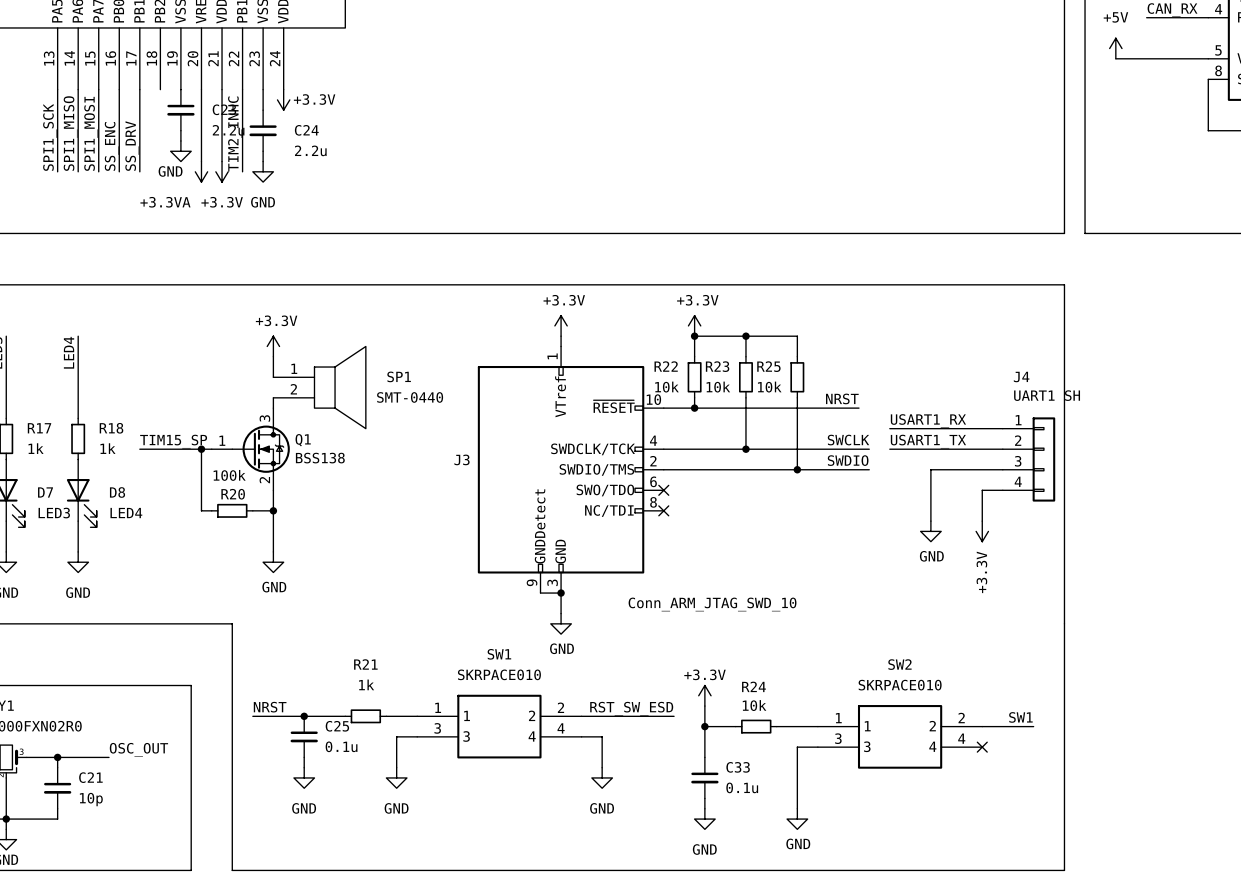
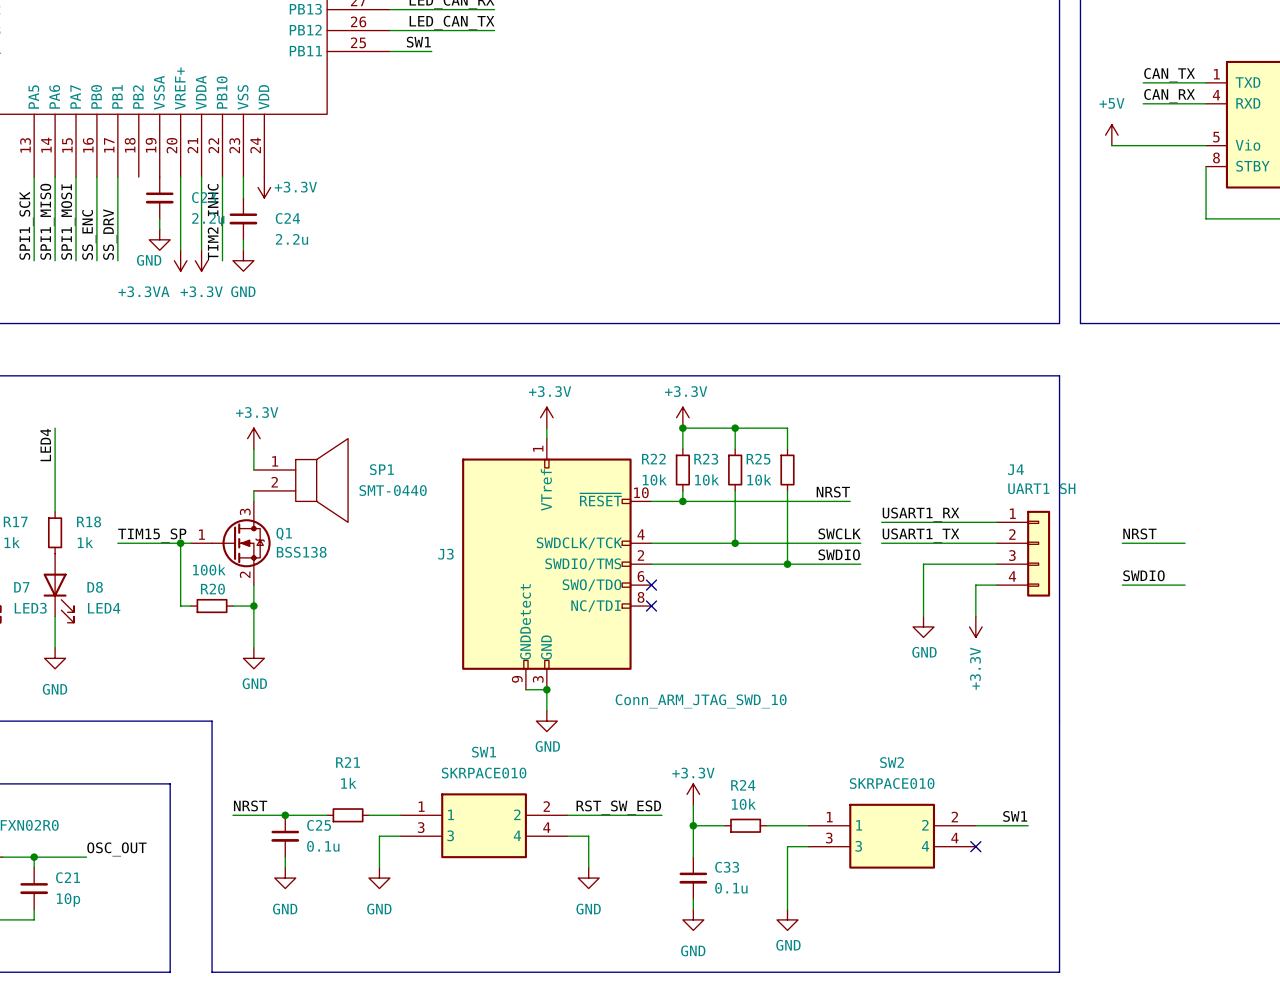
label: none -> NRST (1139, 533)
wire: none -> (1122, 543) (1185, 543)
label: none -> SWDIO (1143, 575)
wire: none -> (1122, 585) (1185, 585)

